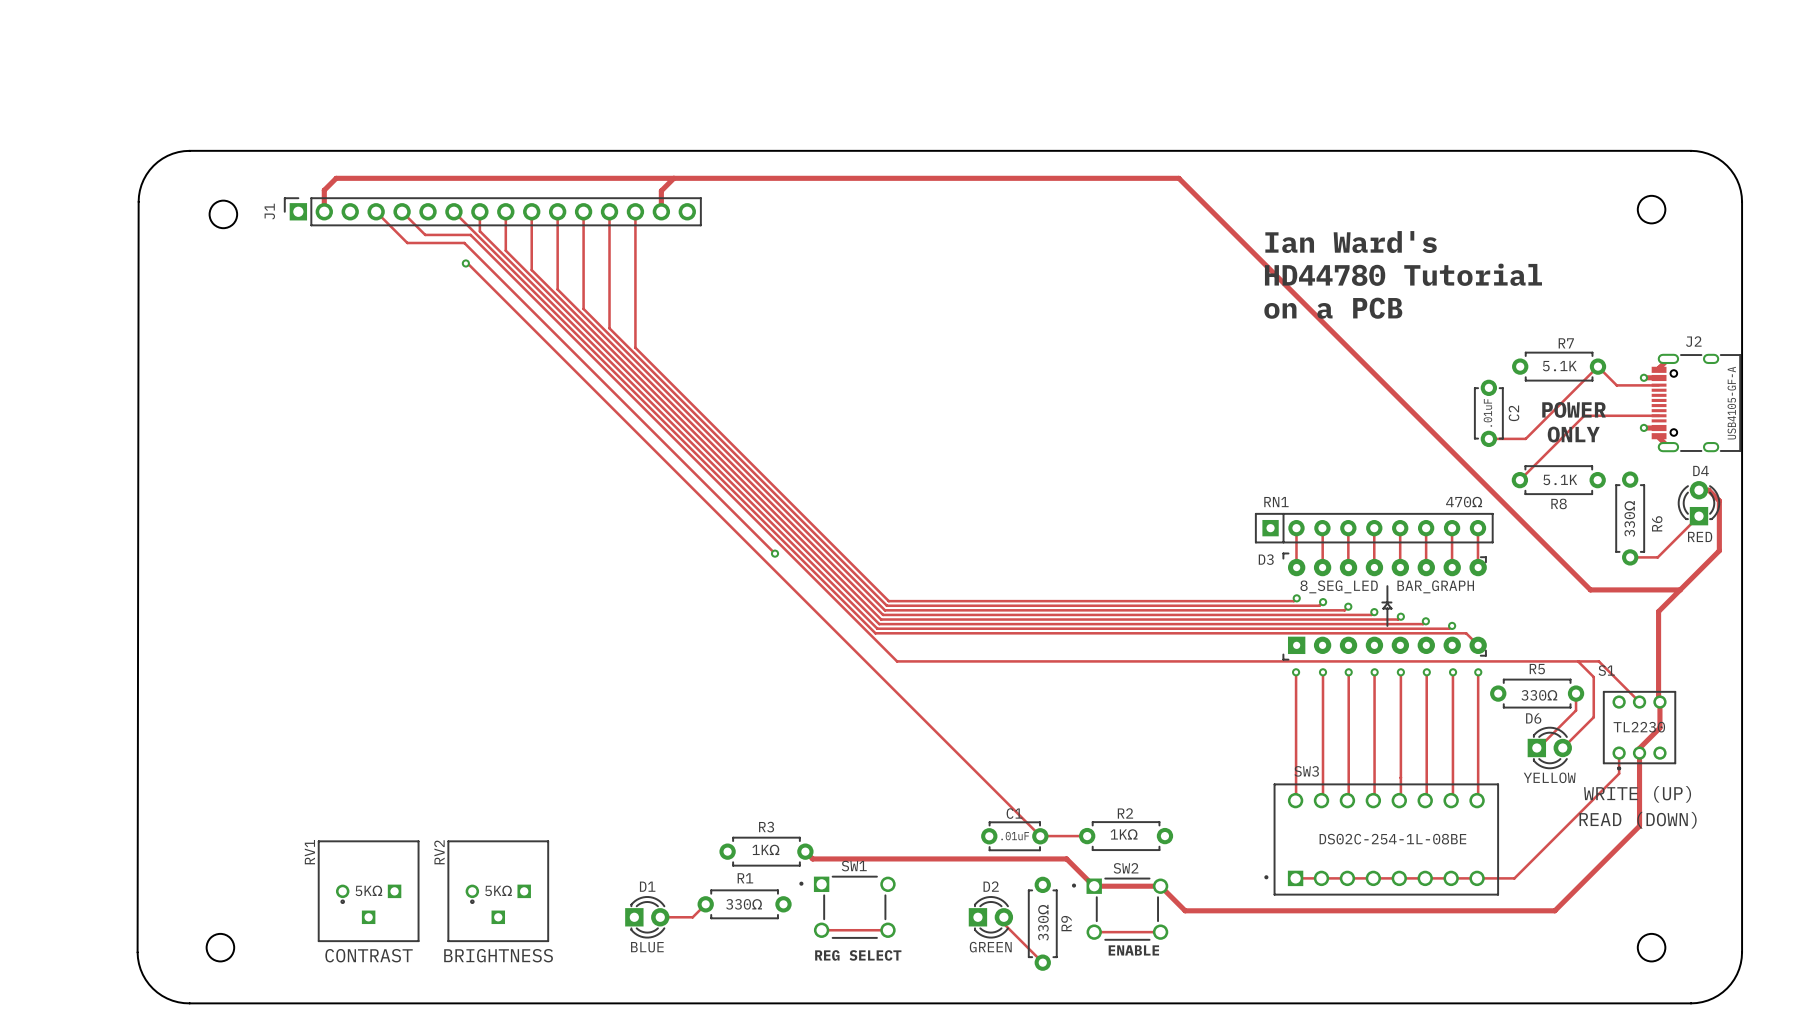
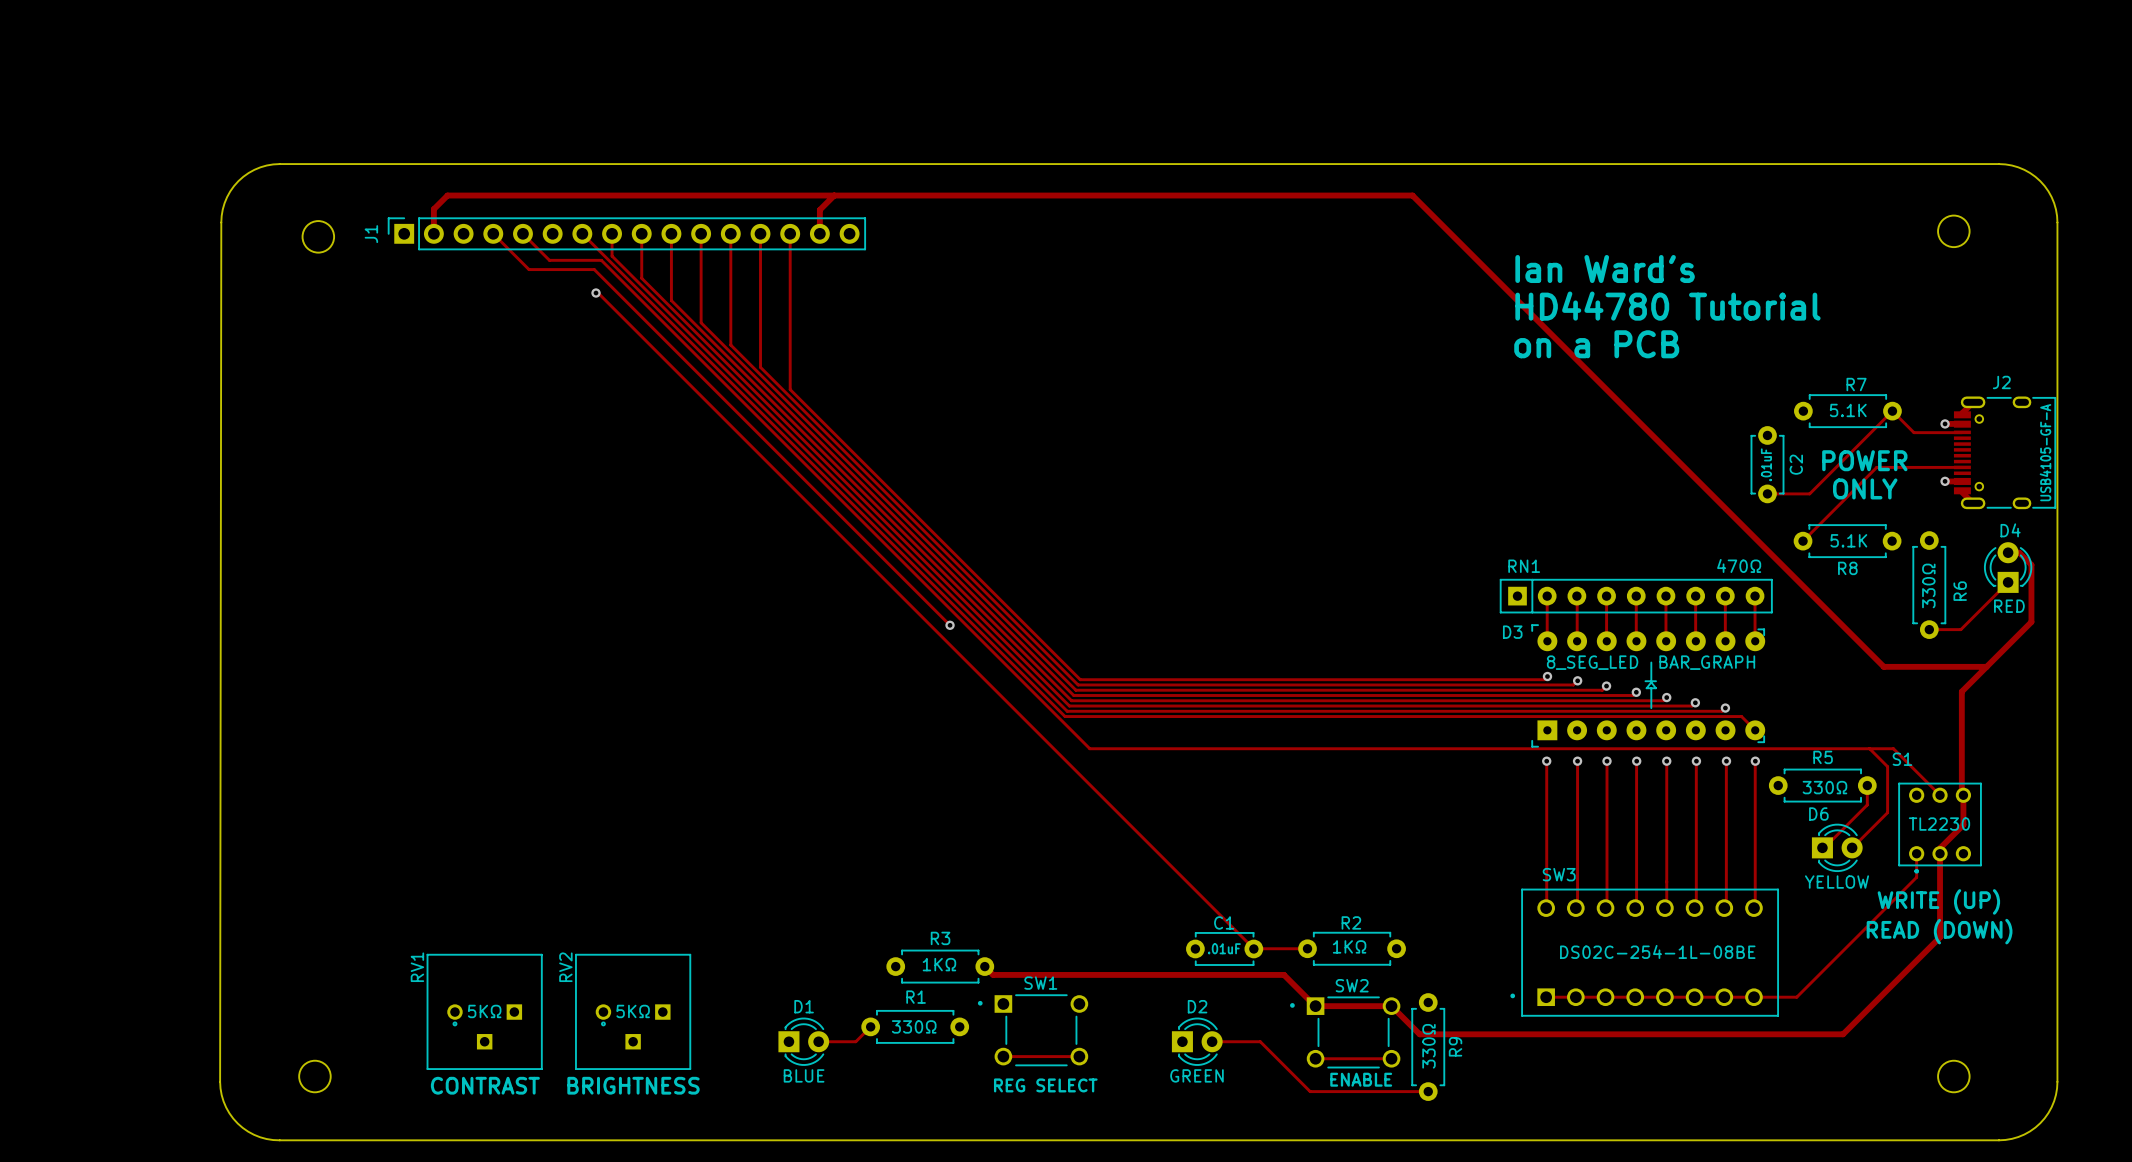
track: (1003, 917) (1003, 923) (1042, 962) -> (1212, 1041) (1260, 1041) (1310, 1091) (1428, 1091)
R9 position: (1042, 923) -> (1428, 1047)

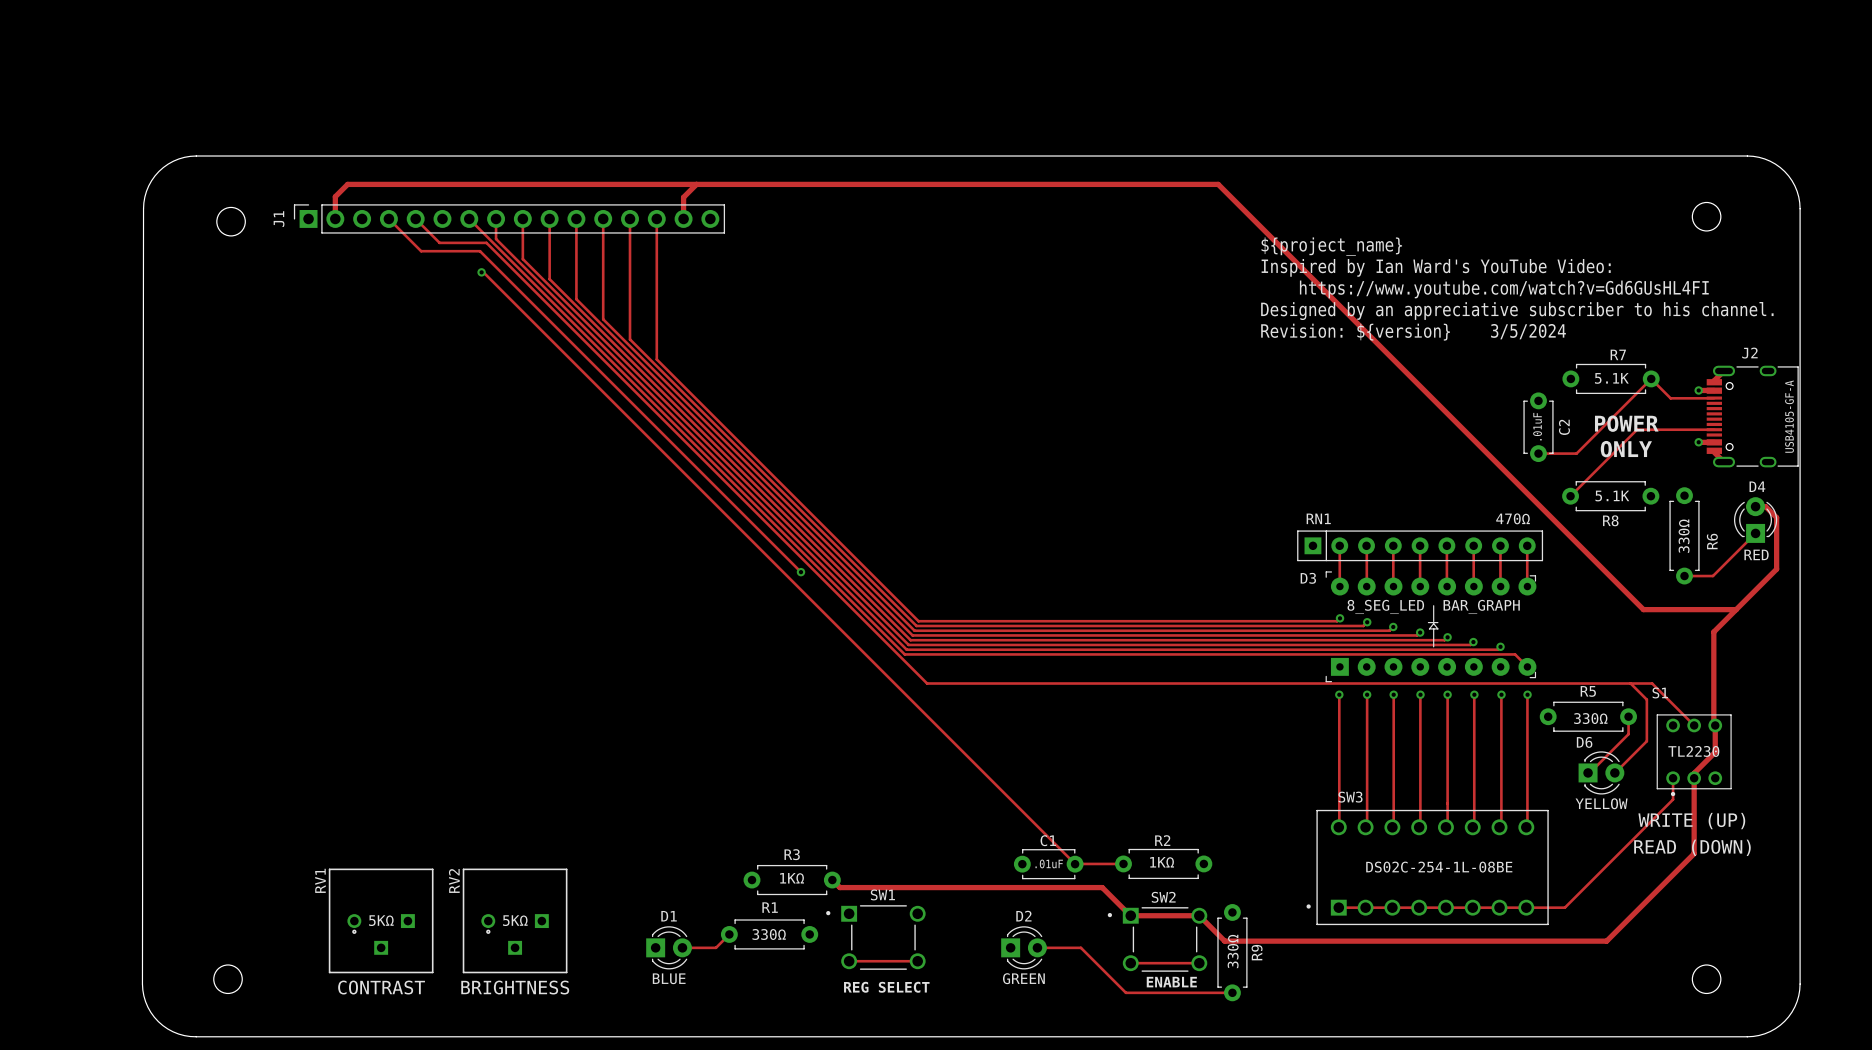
text: none -> ${project_name} (1331, 246)
text: Ian Ward's (1605, 268) -> none
text: none -> Inspired by Ian Ward's YouTube Video: (1436, 267)
text: HD44780 Tutorial (1667, 306) -> none
text: none -> https://www.youtube.com/watch?v=Gd6GUsHL4FI (1504, 289)
text: none -> Designed by an appreciative subscriber to his channel. (1517, 311)
text: on a PCB (1596, 344) -> none
text: none -> Revision: ${version} 3/5/2024 (1413, 332)

